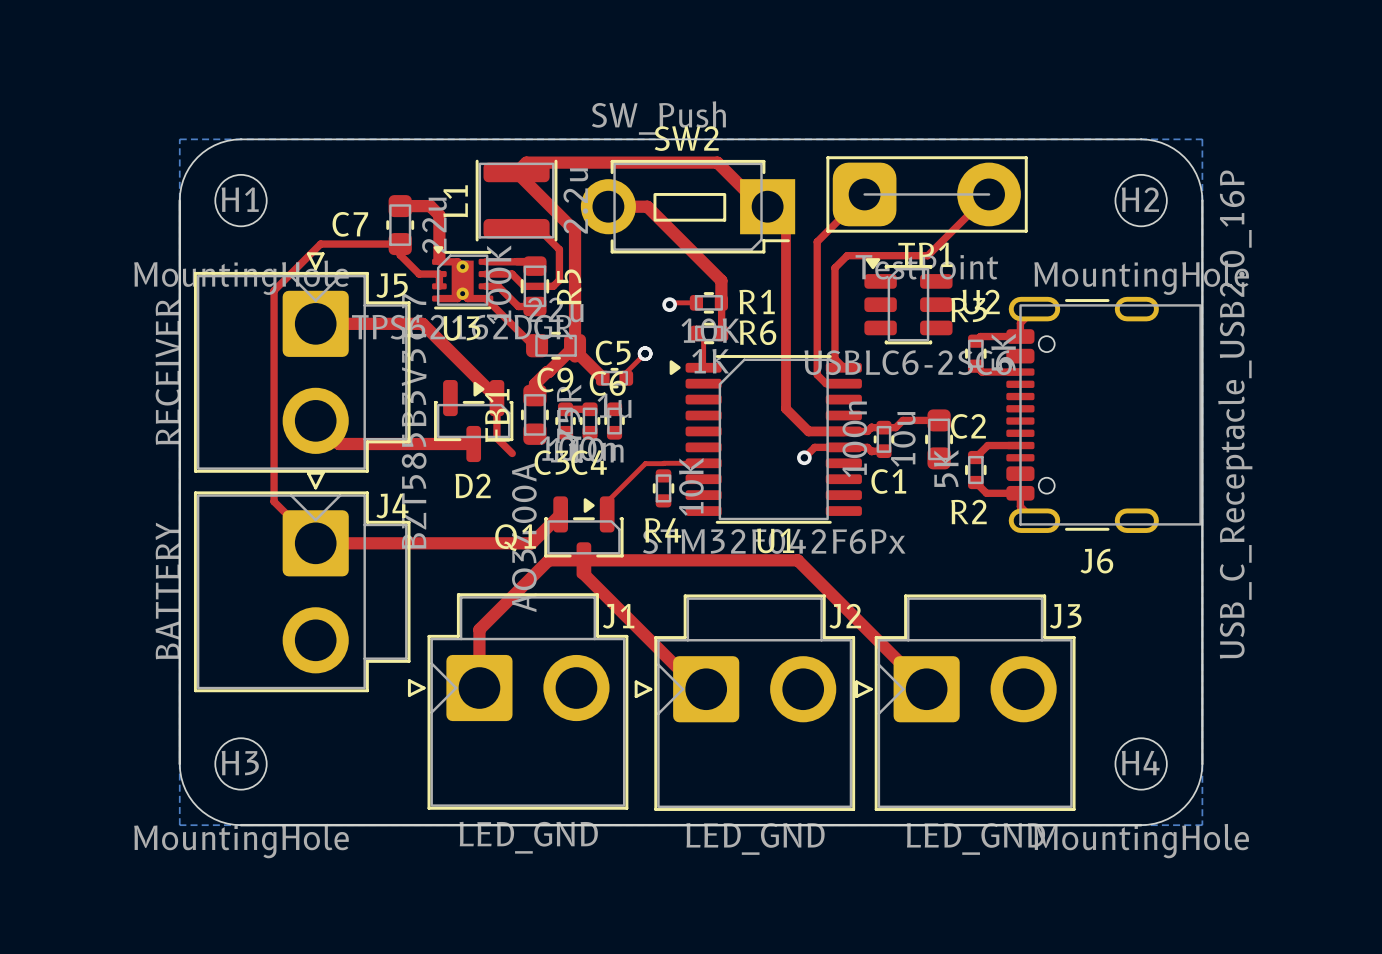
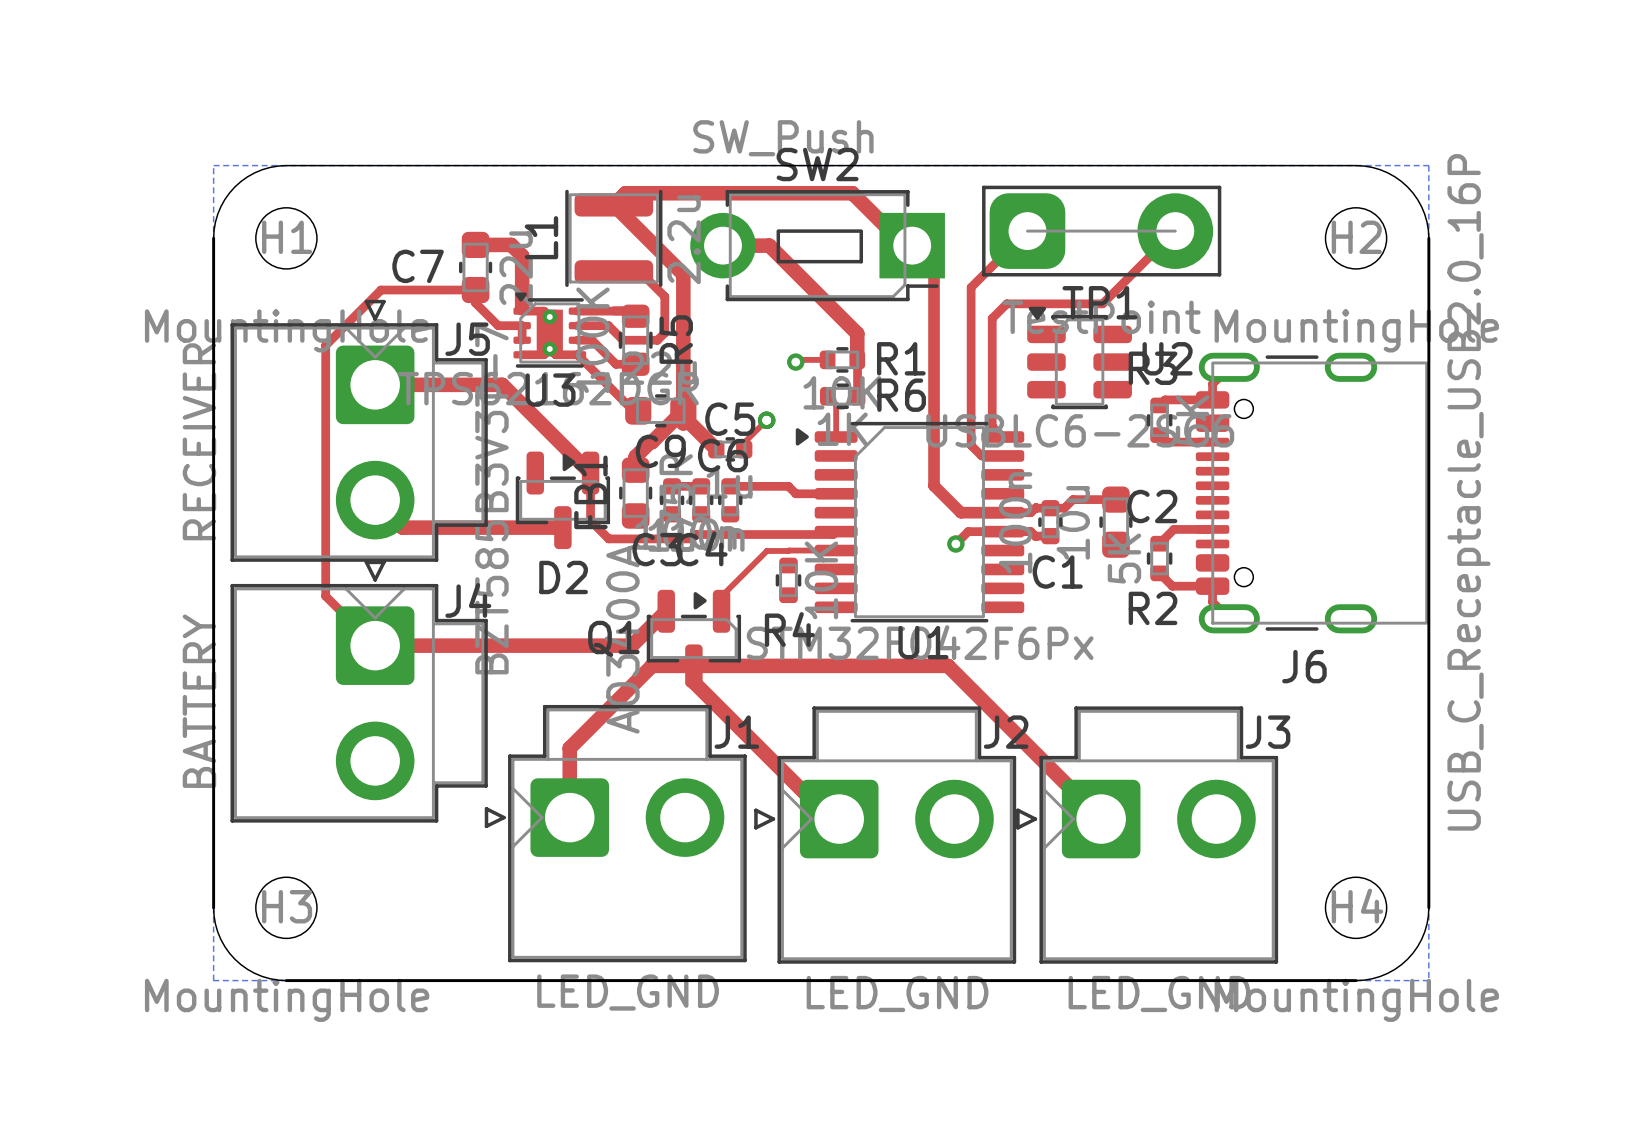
top track: none -> (737, 486) (788, 486) (795, 493) (836, 493)
top track: none -> (836, 531) (833, 534) (696, 534) (691, 538) (608, 538)

